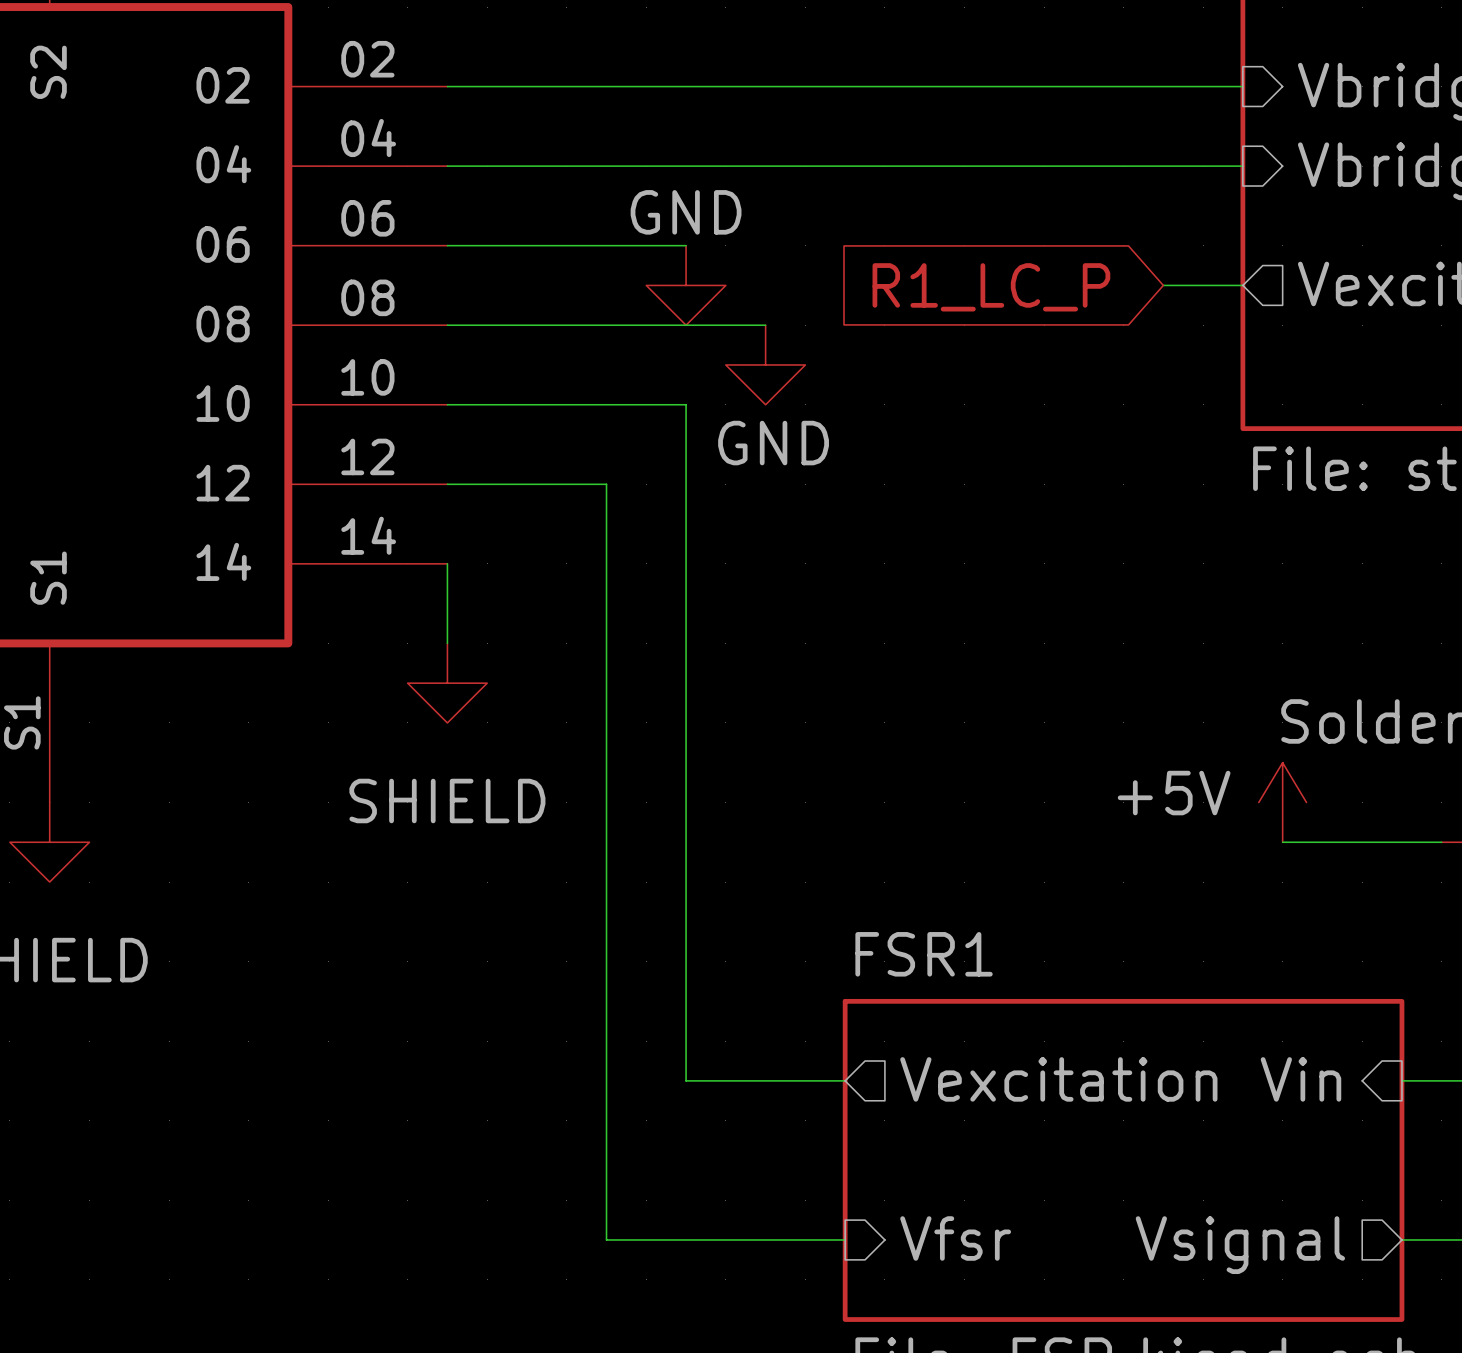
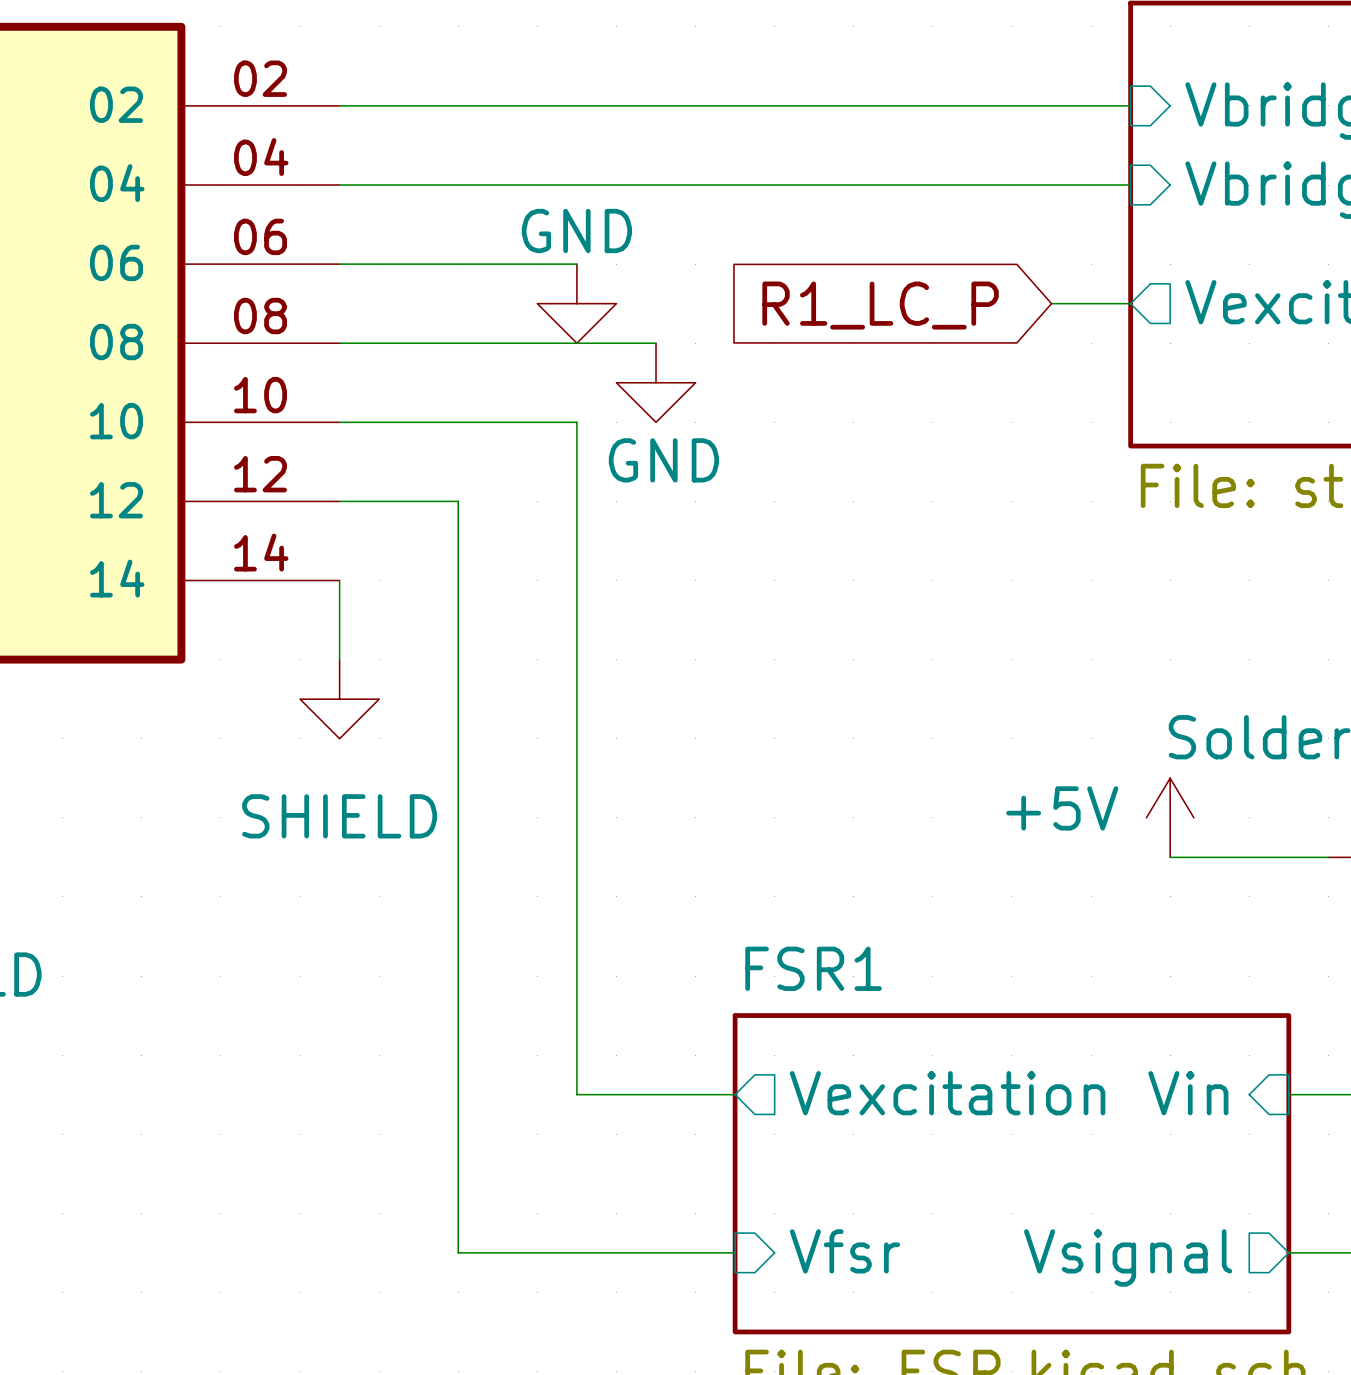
wire: (566, 484) (606, 484) (606, 1239) -> (458, 501) (458, 1252) (497, 1252)

